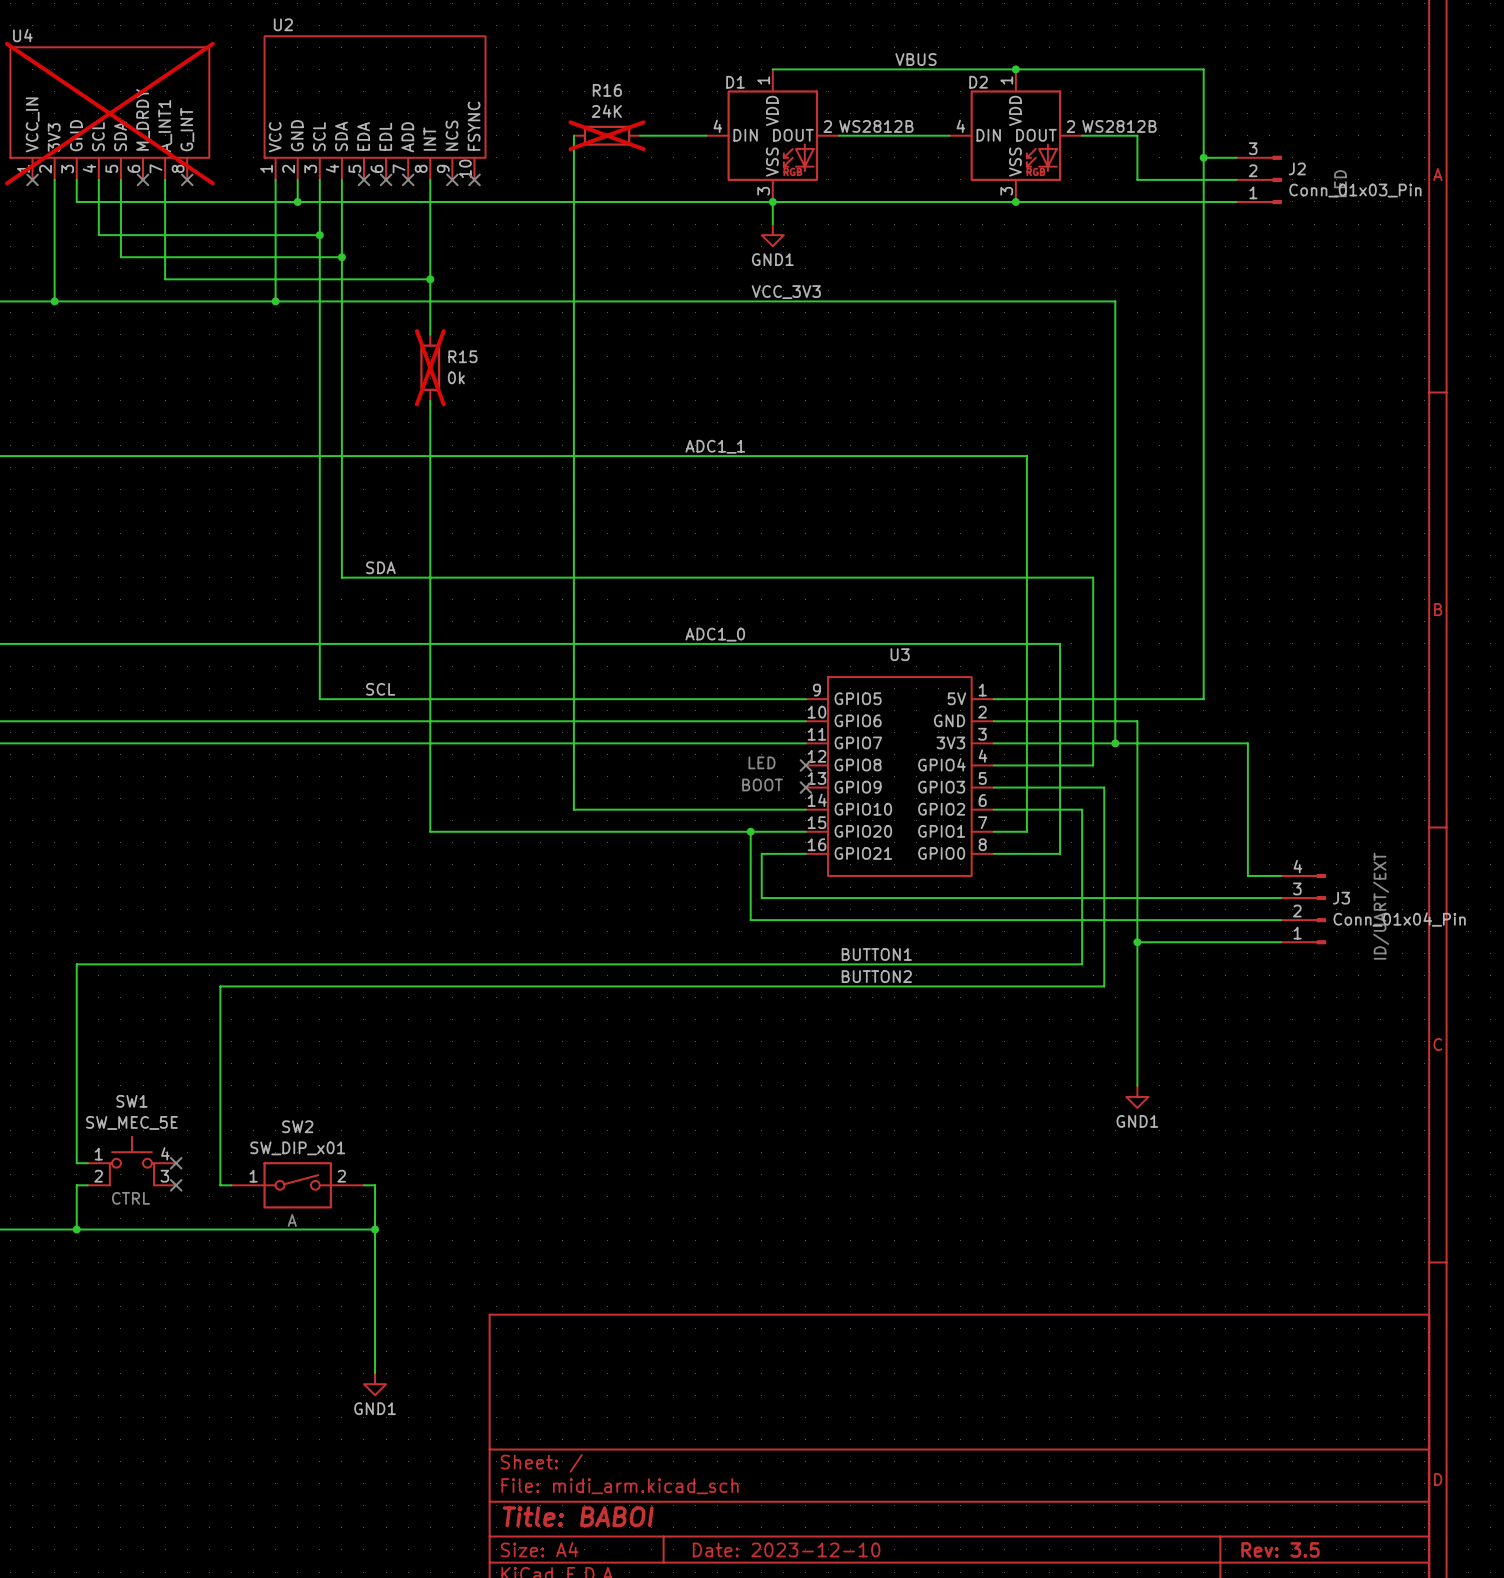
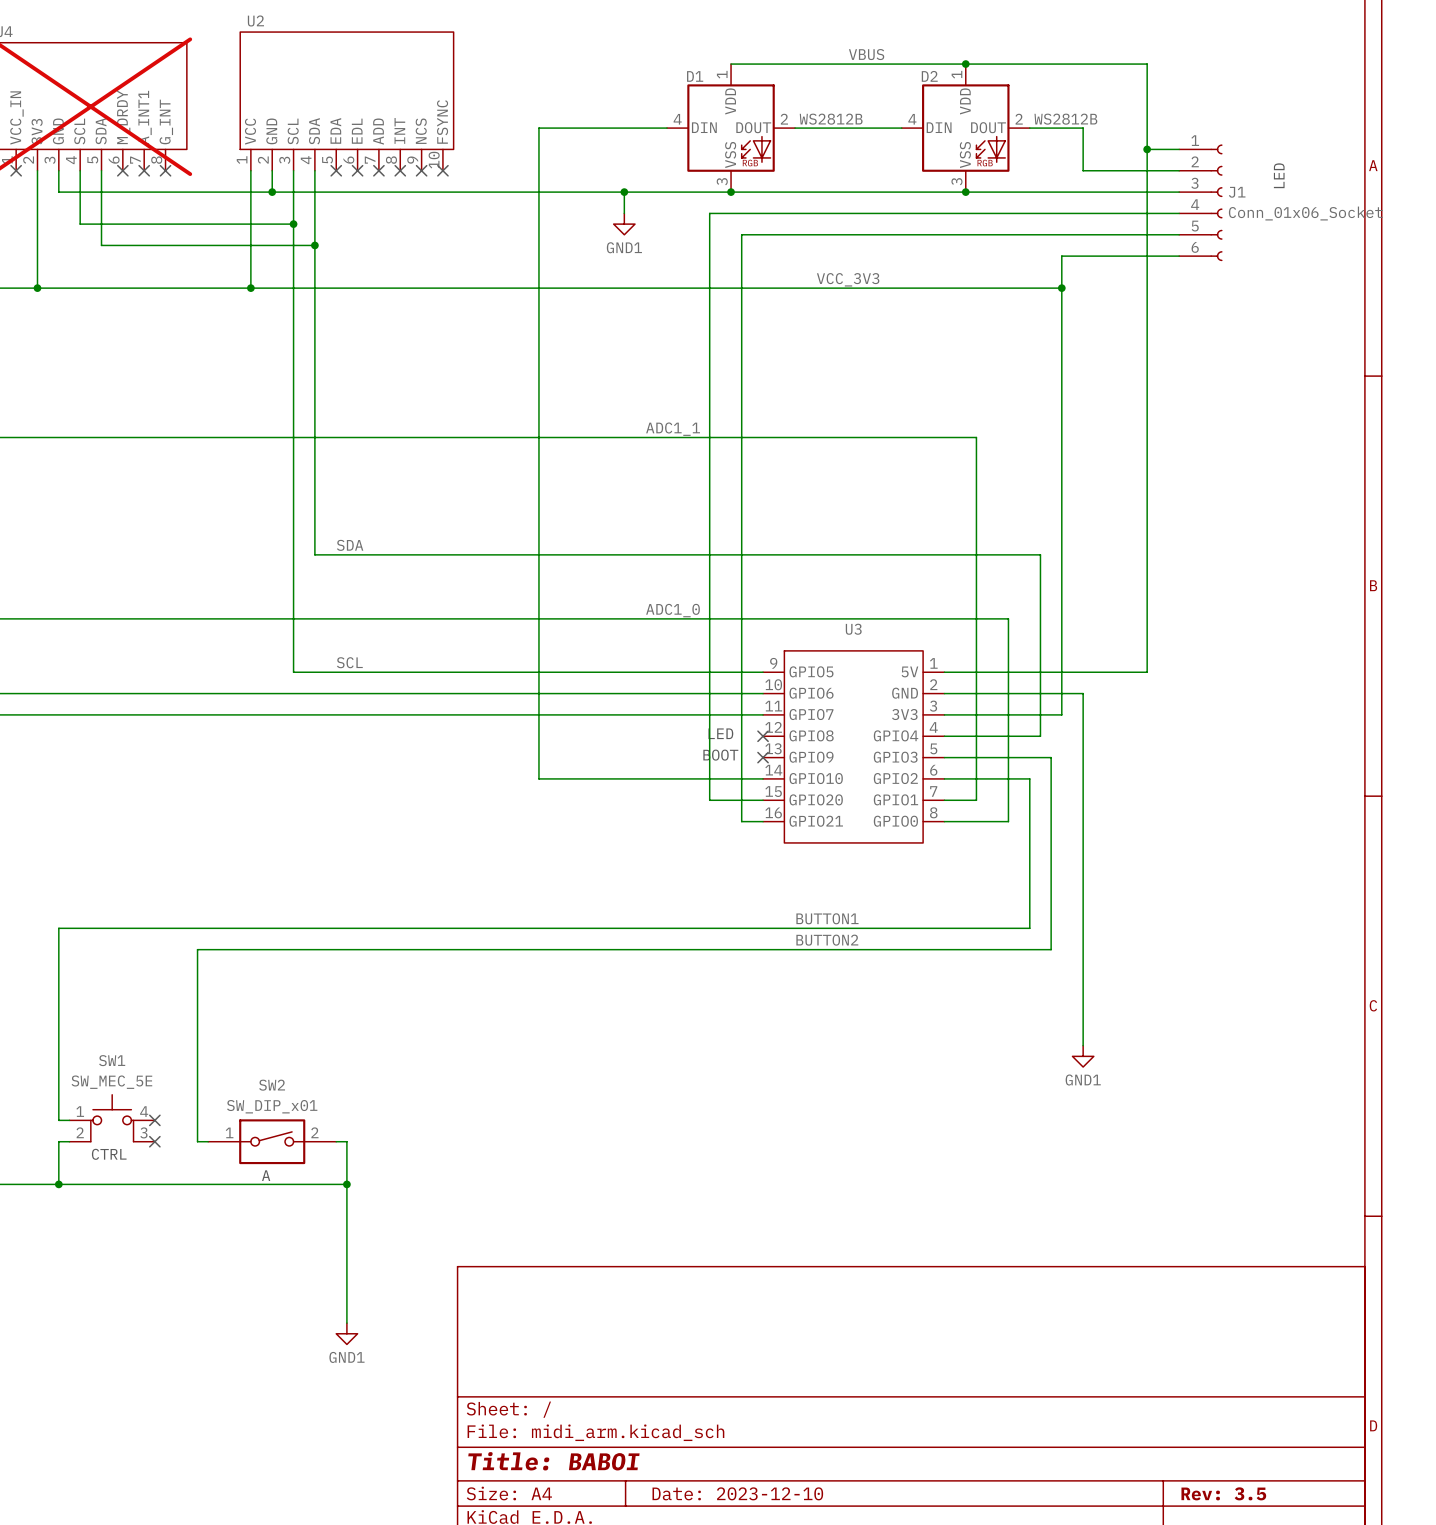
R16: 24K (607, 135) -> none
wire: (165, 179) (165, 279) (430, 279) -> none
no-connect mark: none -> (144, 170)
wire: (430, 179) (430, 334) -> none
no-connect mark: none -> (400, 170)
J2: Conn_01x03_Pin (1259, 179) -> none
junction: none -> (624, 192)
wire: (772, 201) (772, 224) -> (624, 192) (624, 213)
J1: none -> Conn_01x06_Socket (1200, 202)
wire: none -> (1179, 213) (709, 213) (709, 800)
power symbol position: GND1 (772, 235) -> GND1 (624, 224)
wire: none -> (1179, 256) (1061, 256) (1061, 288)
junction: (430, 279) -> none
label position: VCC_3V3 (786, 292) -> VCC_3V3 (848, 279)
junction: none -> (1061, 288)
R15: 0k (430, 367) -> none
wire: (430, 400) (430, 831) (750, 831) (750, 920) (1281, 920) -> none
wire: (1115, 743) (1247, 743) (1247, 875) (1281, 875) -> none
junction: (1115, 743) -> none
junction: (750, 831) -> none
wire: (783, 853) (761, 853) (761, 898) (1281, 898) -> (741, 821) (741, 234) (1179, 234)
text: ID/UART/EXT (1381, 906) -> none
J3: Conn_01x04_Pin (1303, 909) -> none
wire: (1137, 942) (1281, 942) -> none
junction: (1137, 942) -> none

